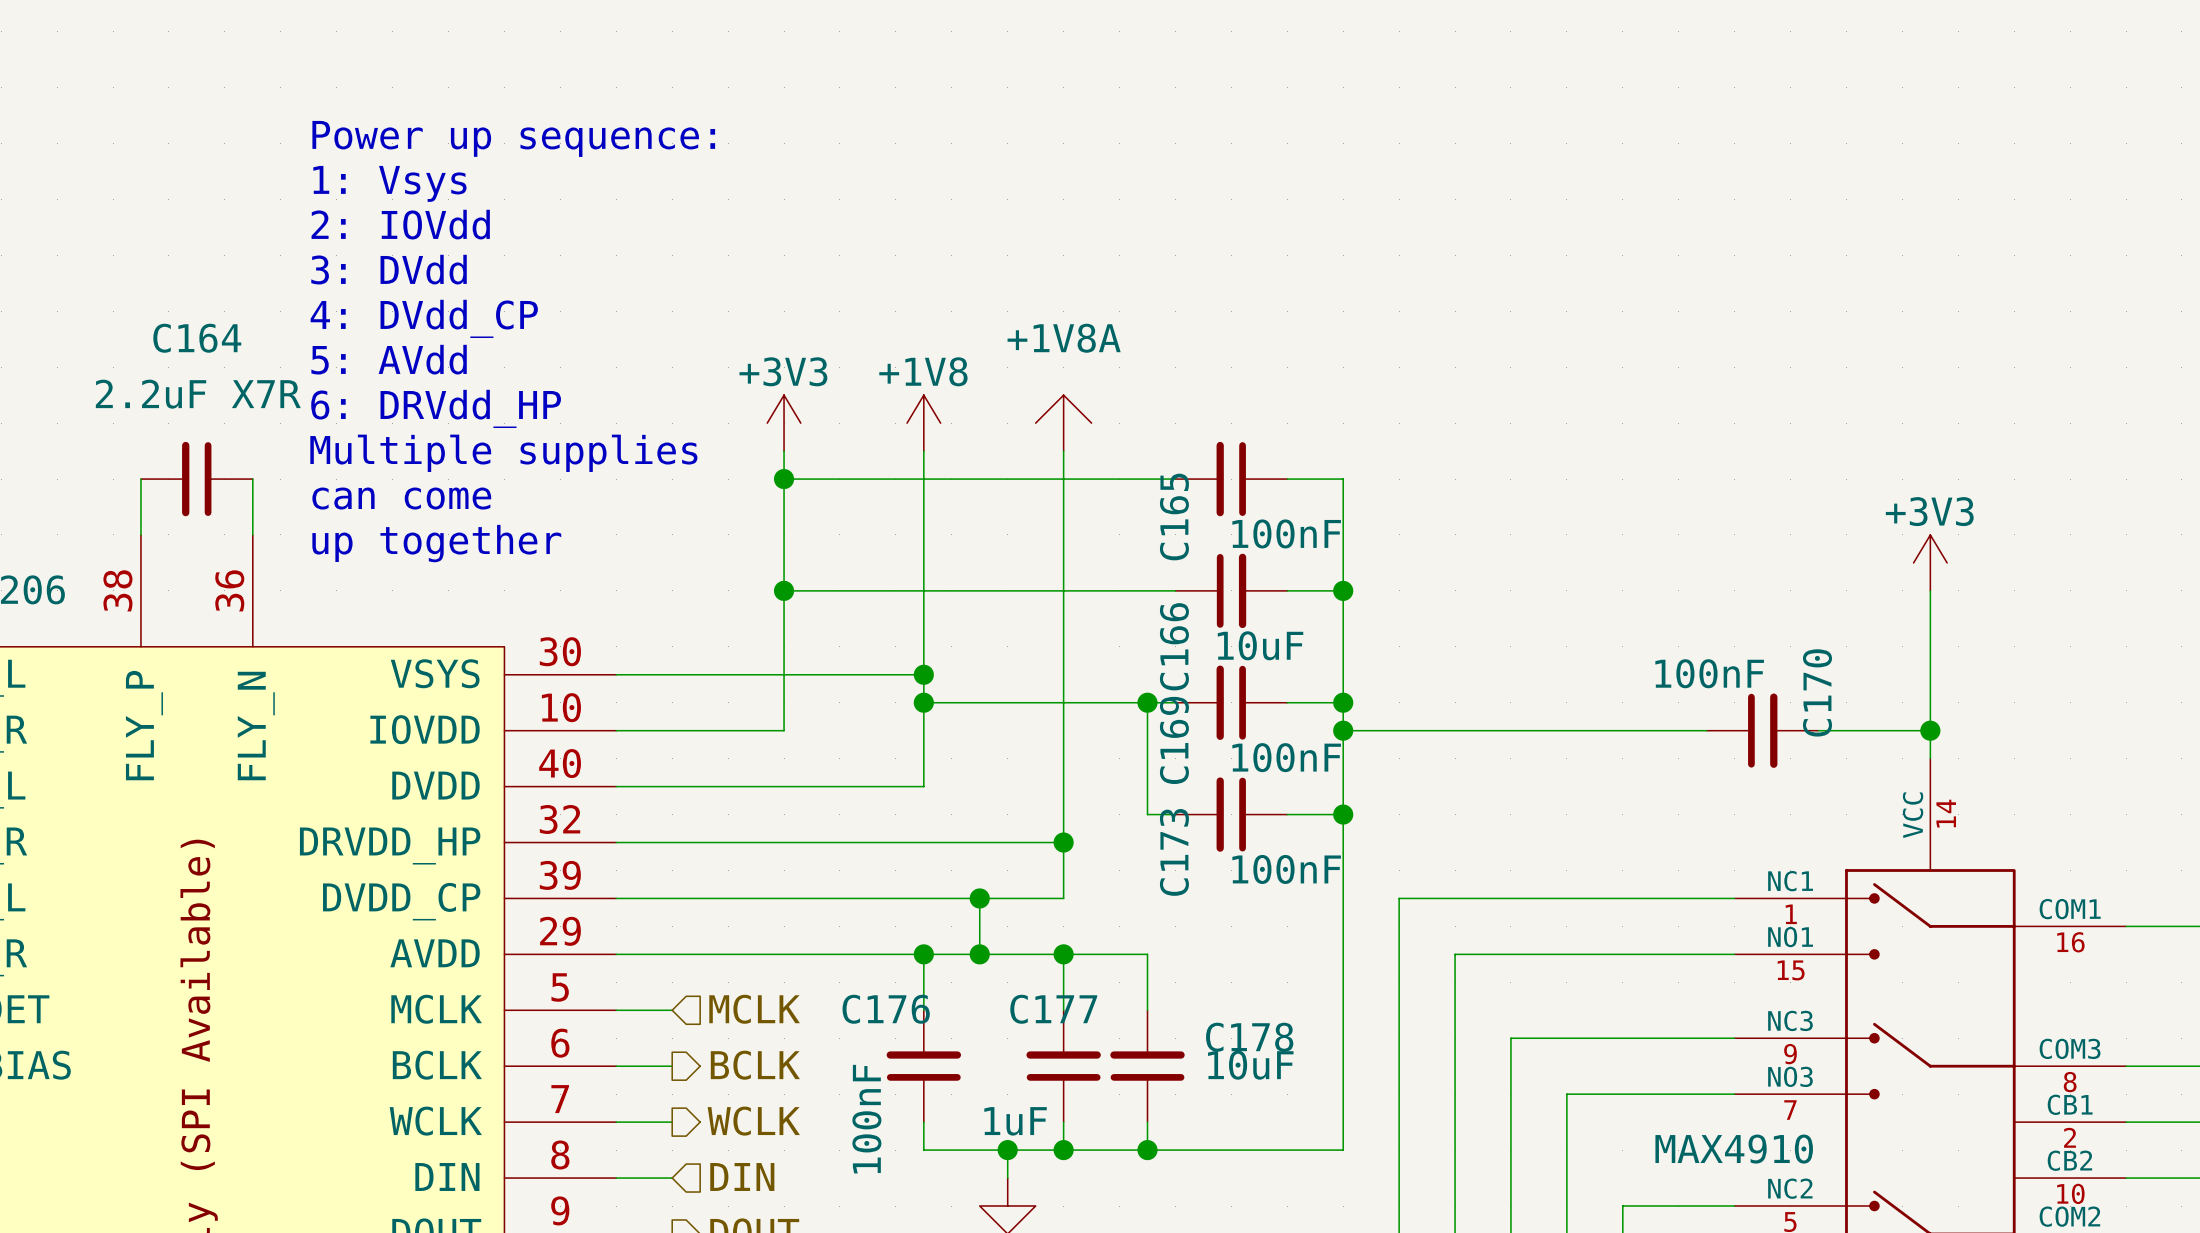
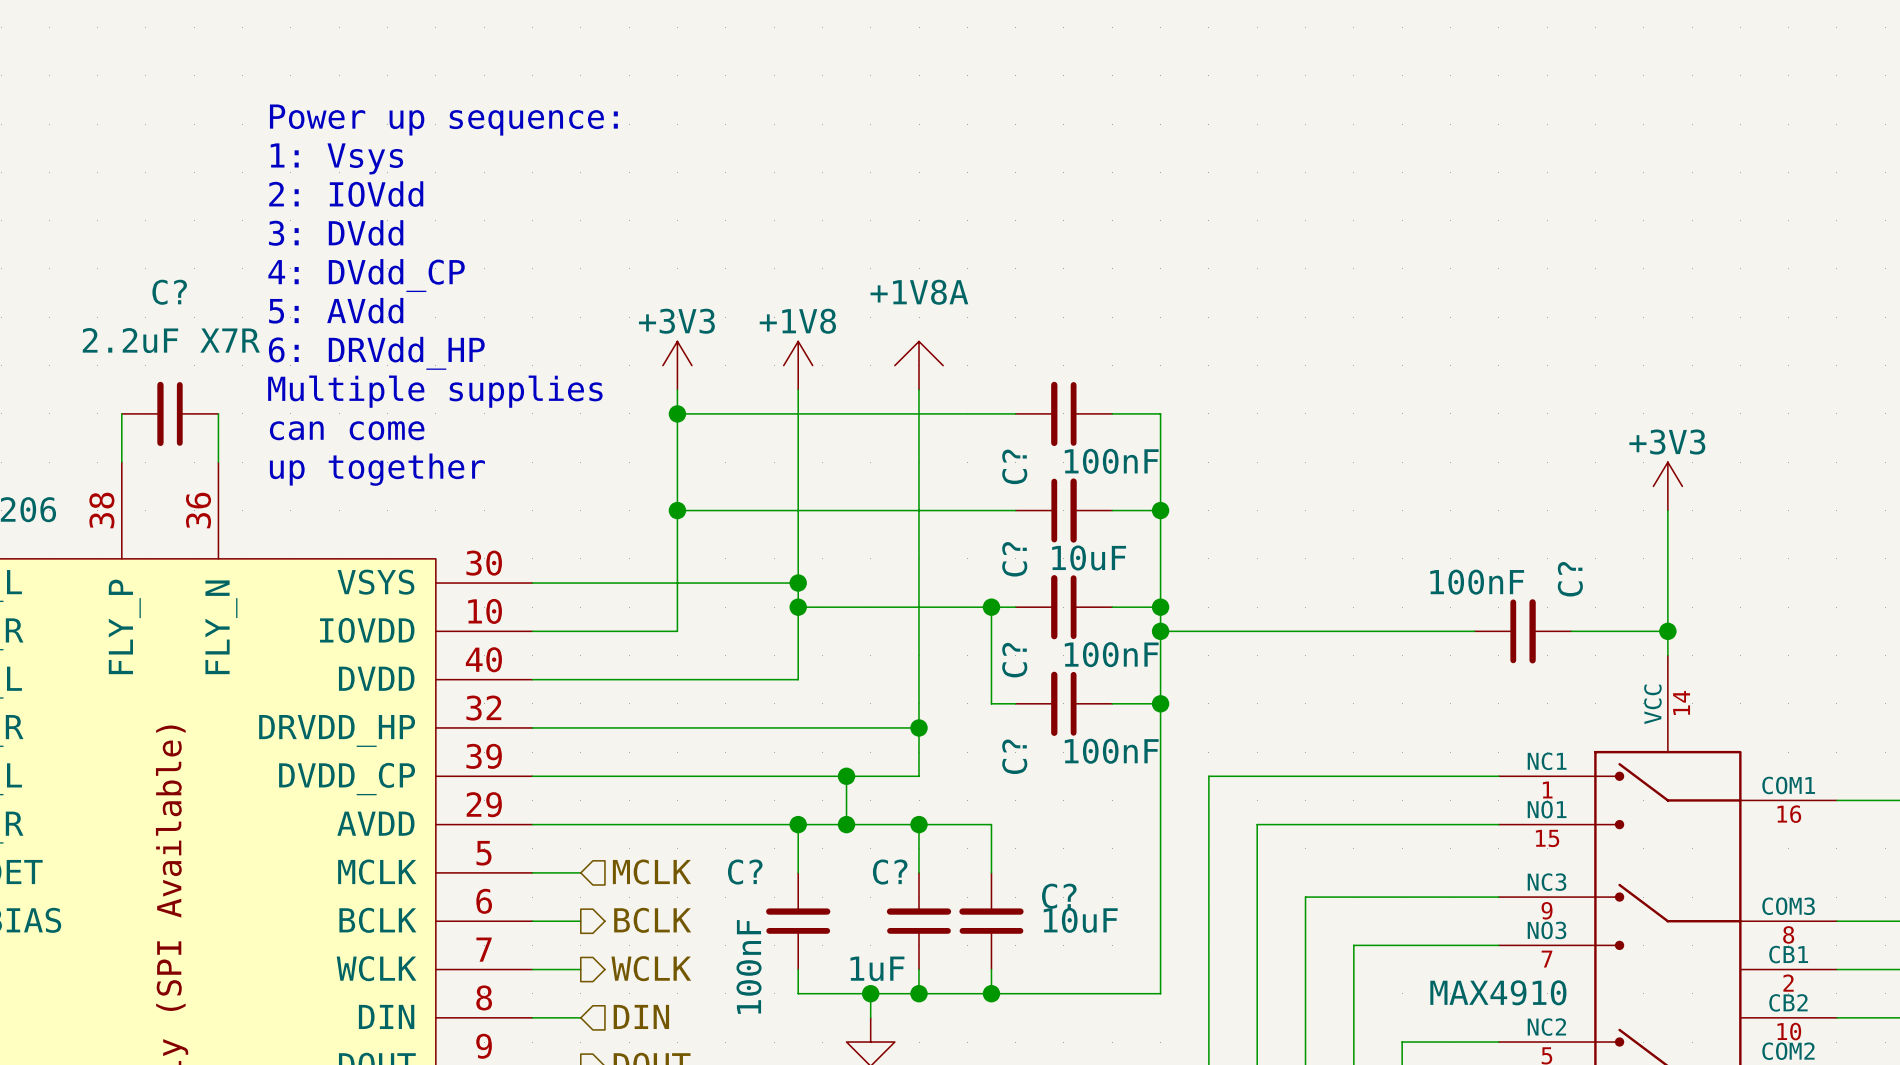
C164 name: C164 (197, 338) -> C? (169, 292)
C165 name: C165 (1174, 516) -> C? (1014, 466)
C166 name: C166 (1174, 646) -> C? (1014, 559)
C170 name: C170 (1817, 692) -> C? (1570, 579)
C169 name: C169 (1174, 740) -> C? (1014, 660)
C173 name: C173 (1174, 852) -> C? (1014, 756)
C176 name: C176 (886, 1009) -> C? (745, 872)
C177 name: C177 (1053, 1009) -> C? (890, 872)
C178 name: C178 (1249, 1037) -> C? (1059, 896)

